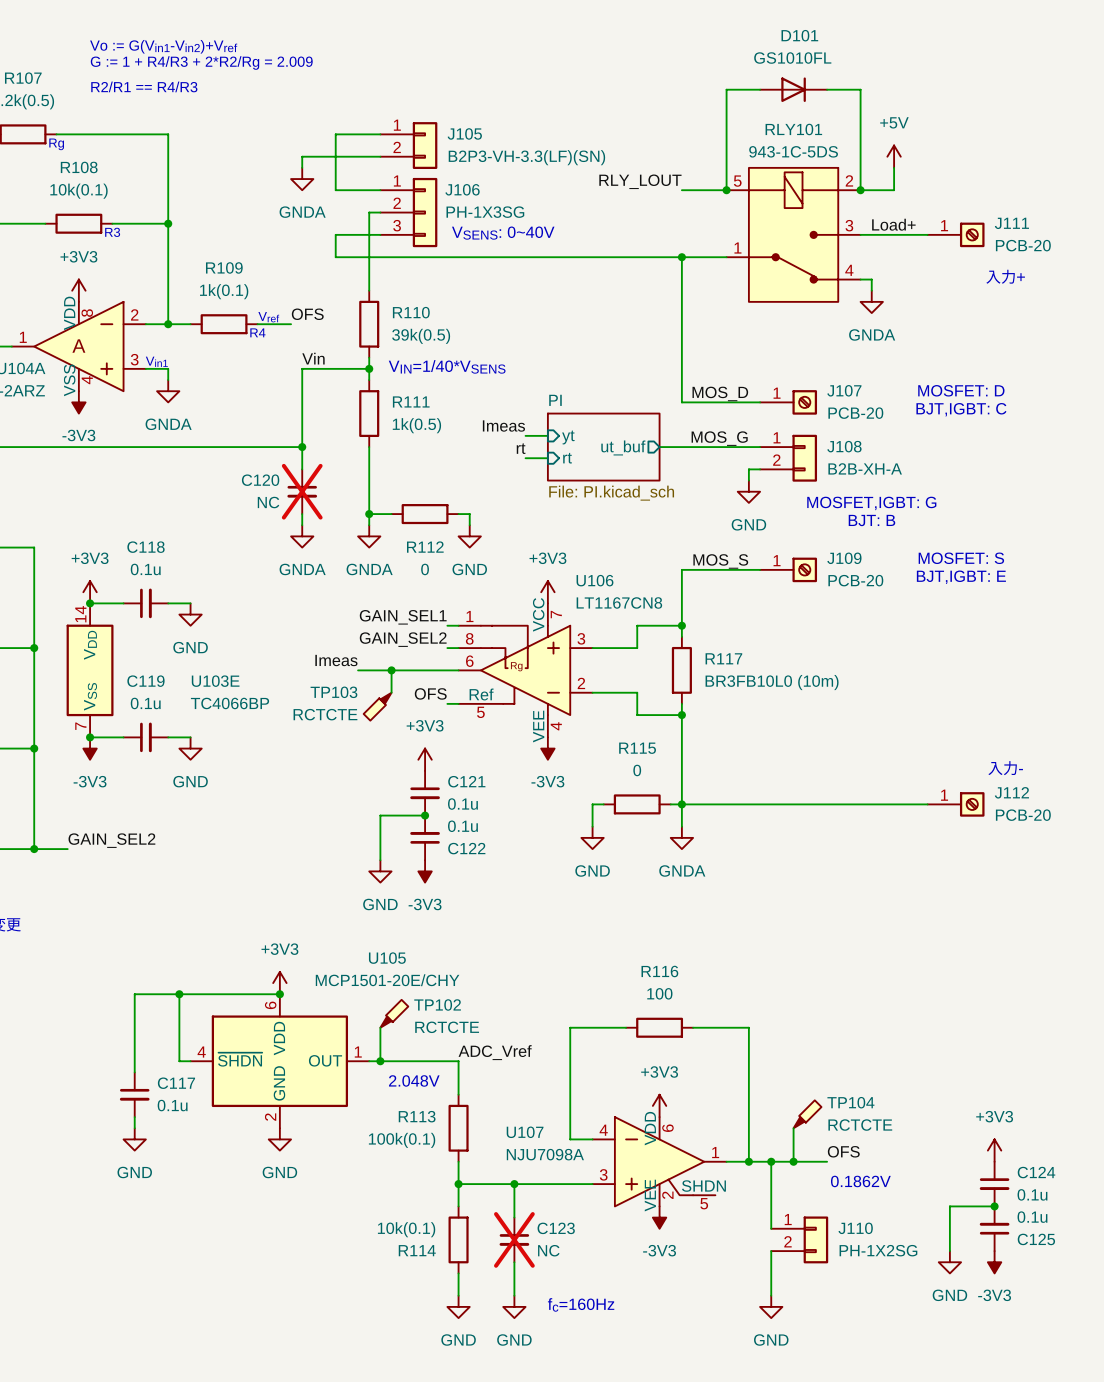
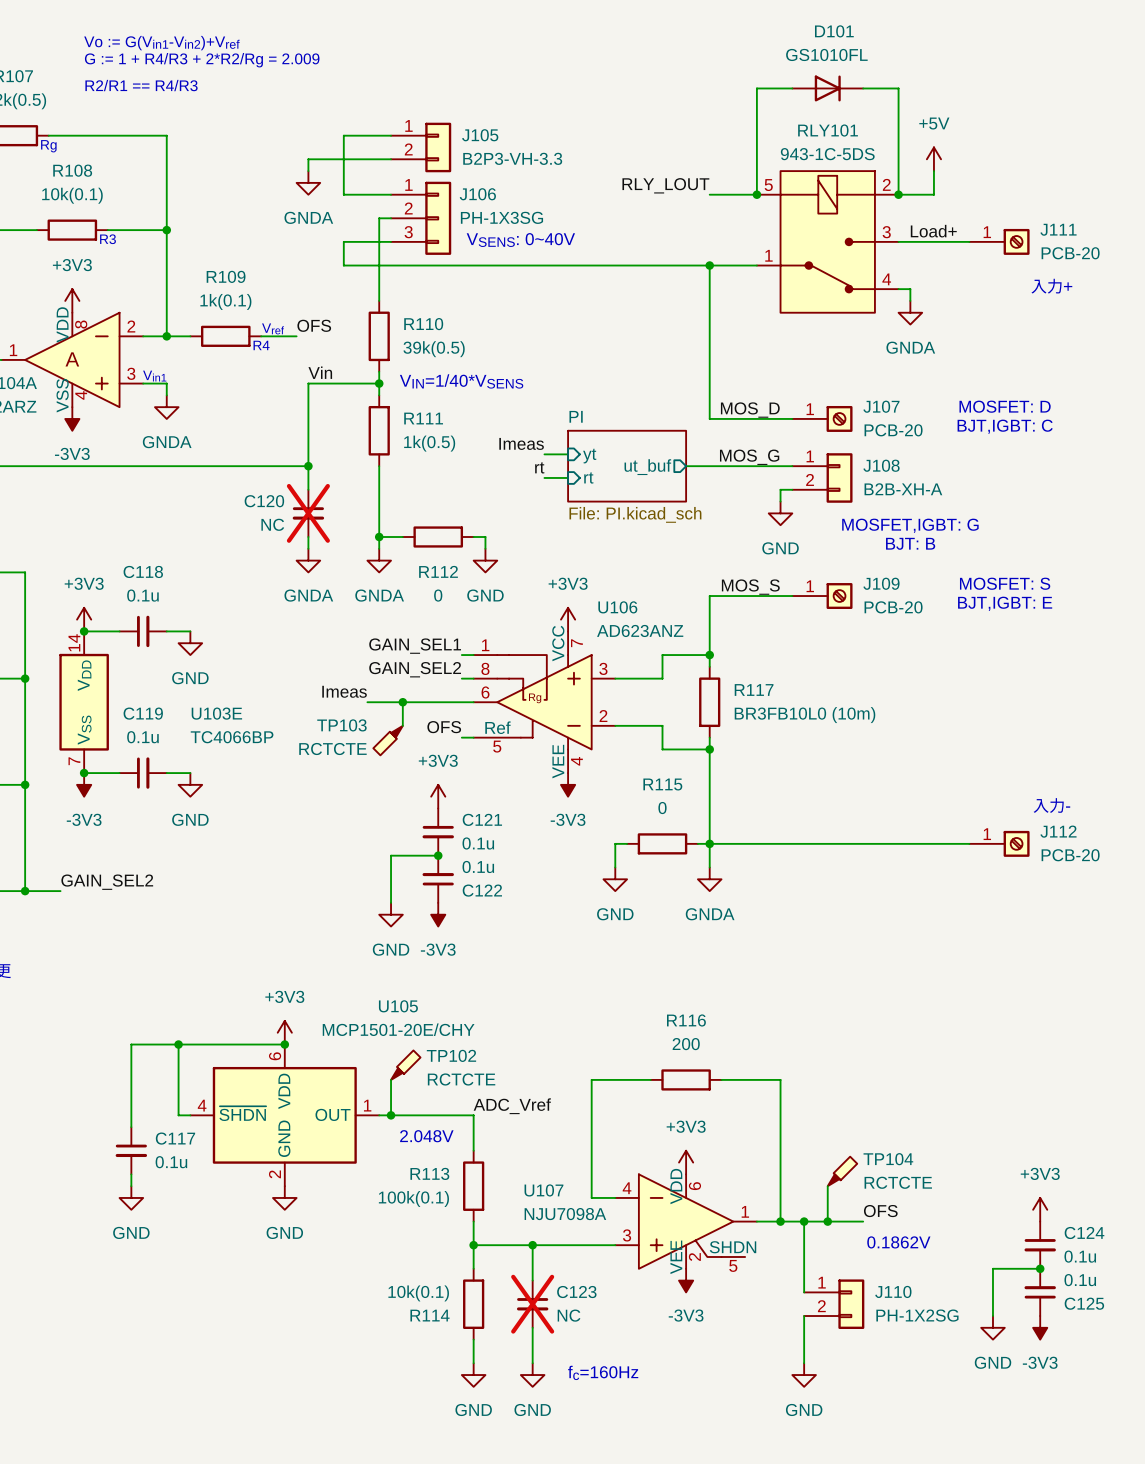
J105 value: B2P3-VH-3.3(LF)(SN) (526, 157) -> B2P3-VH-3.3 (512, 158)
U106 value: LT1167CN8 (619, 602) -> AD623ANZ (640, 630)
R116 value: 100 (659, 993) -> 200 (686, 1044)

